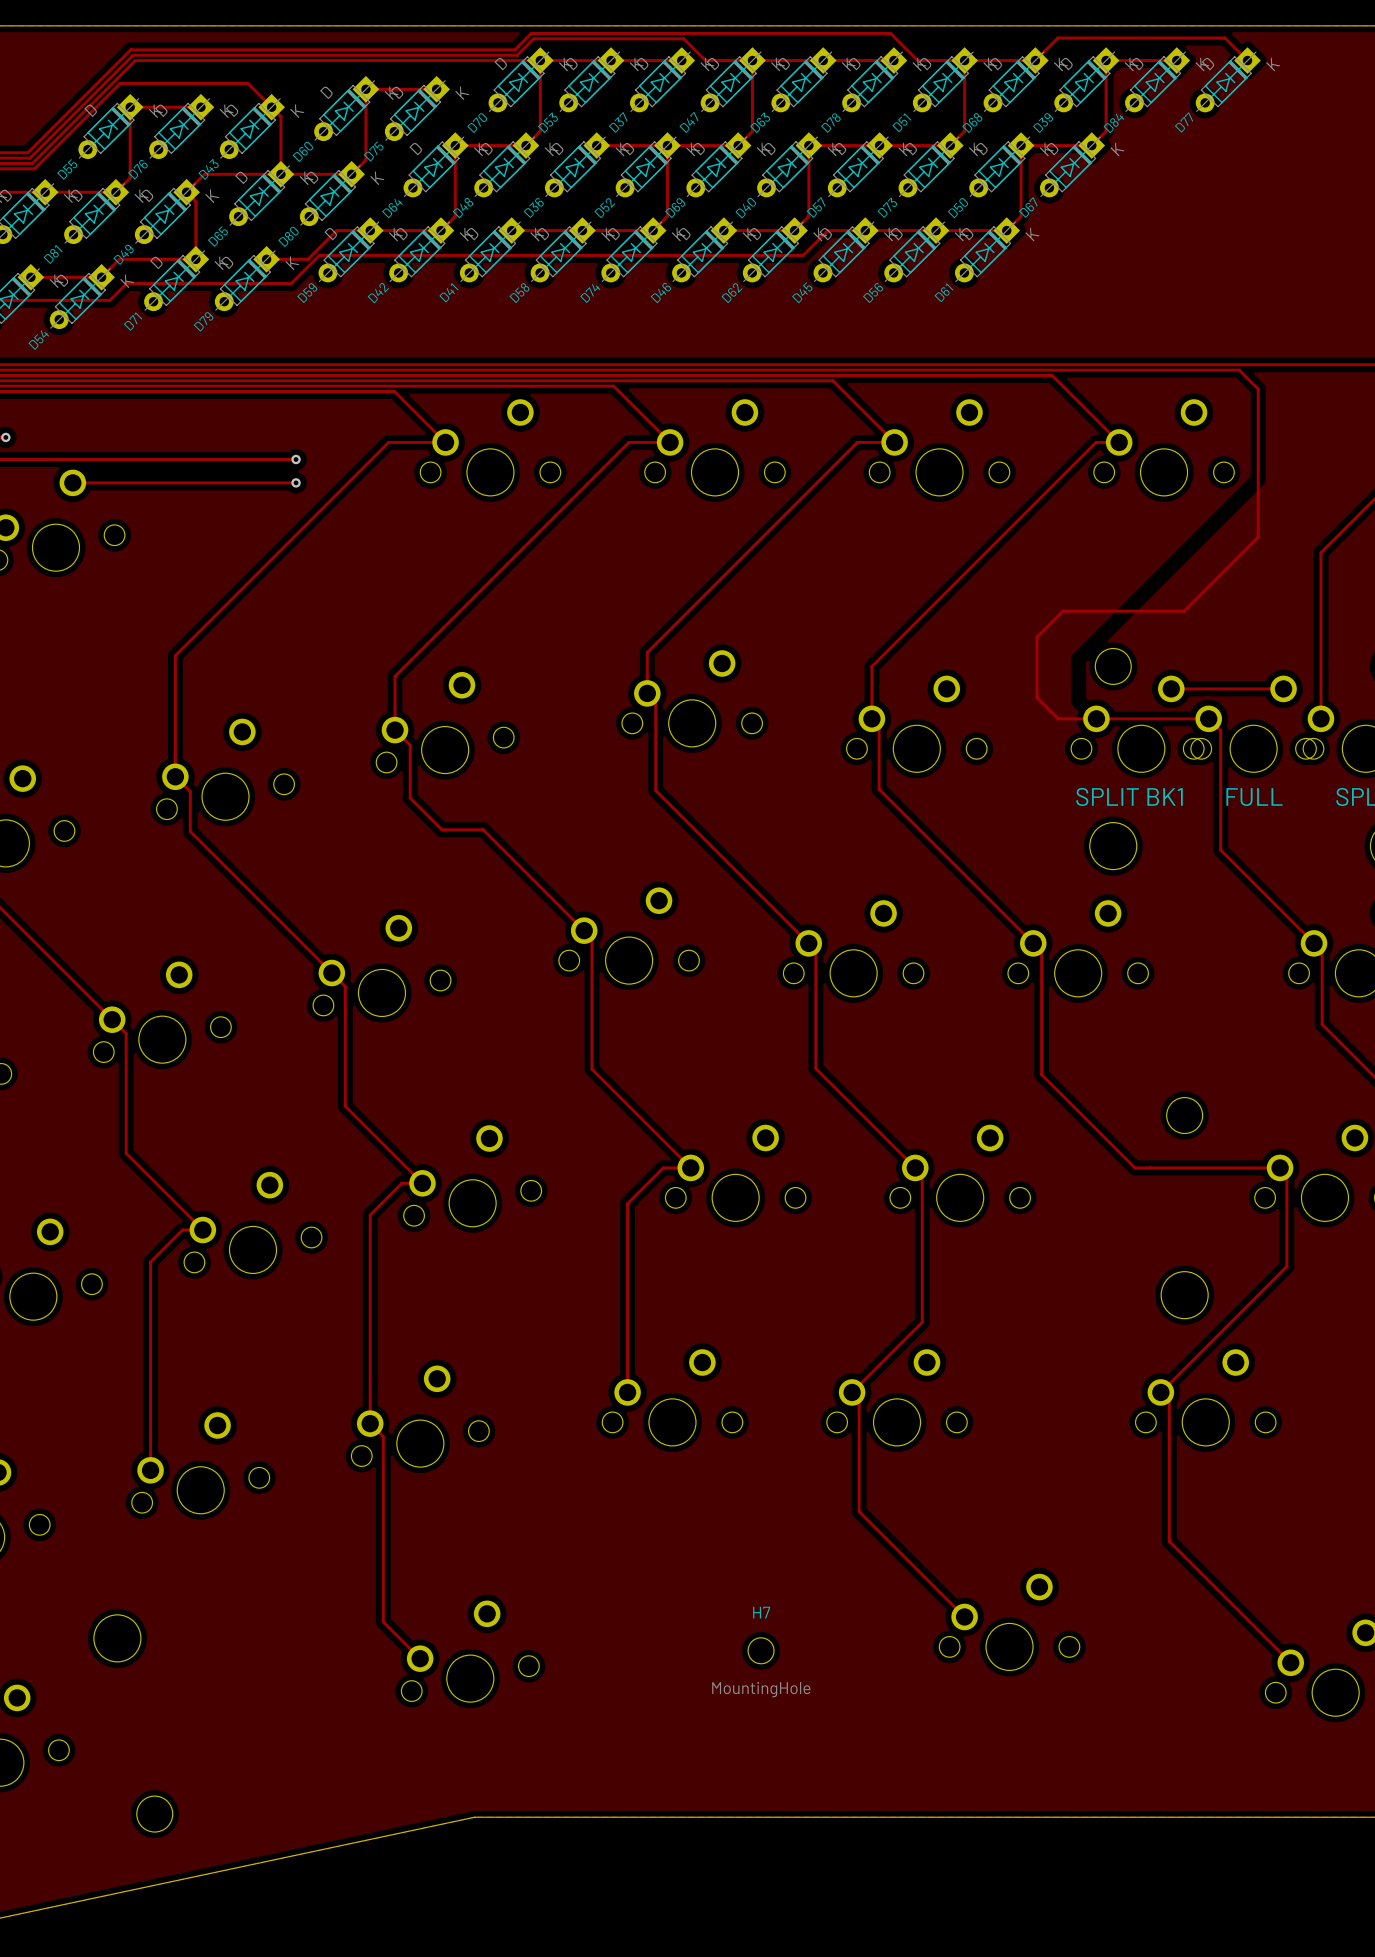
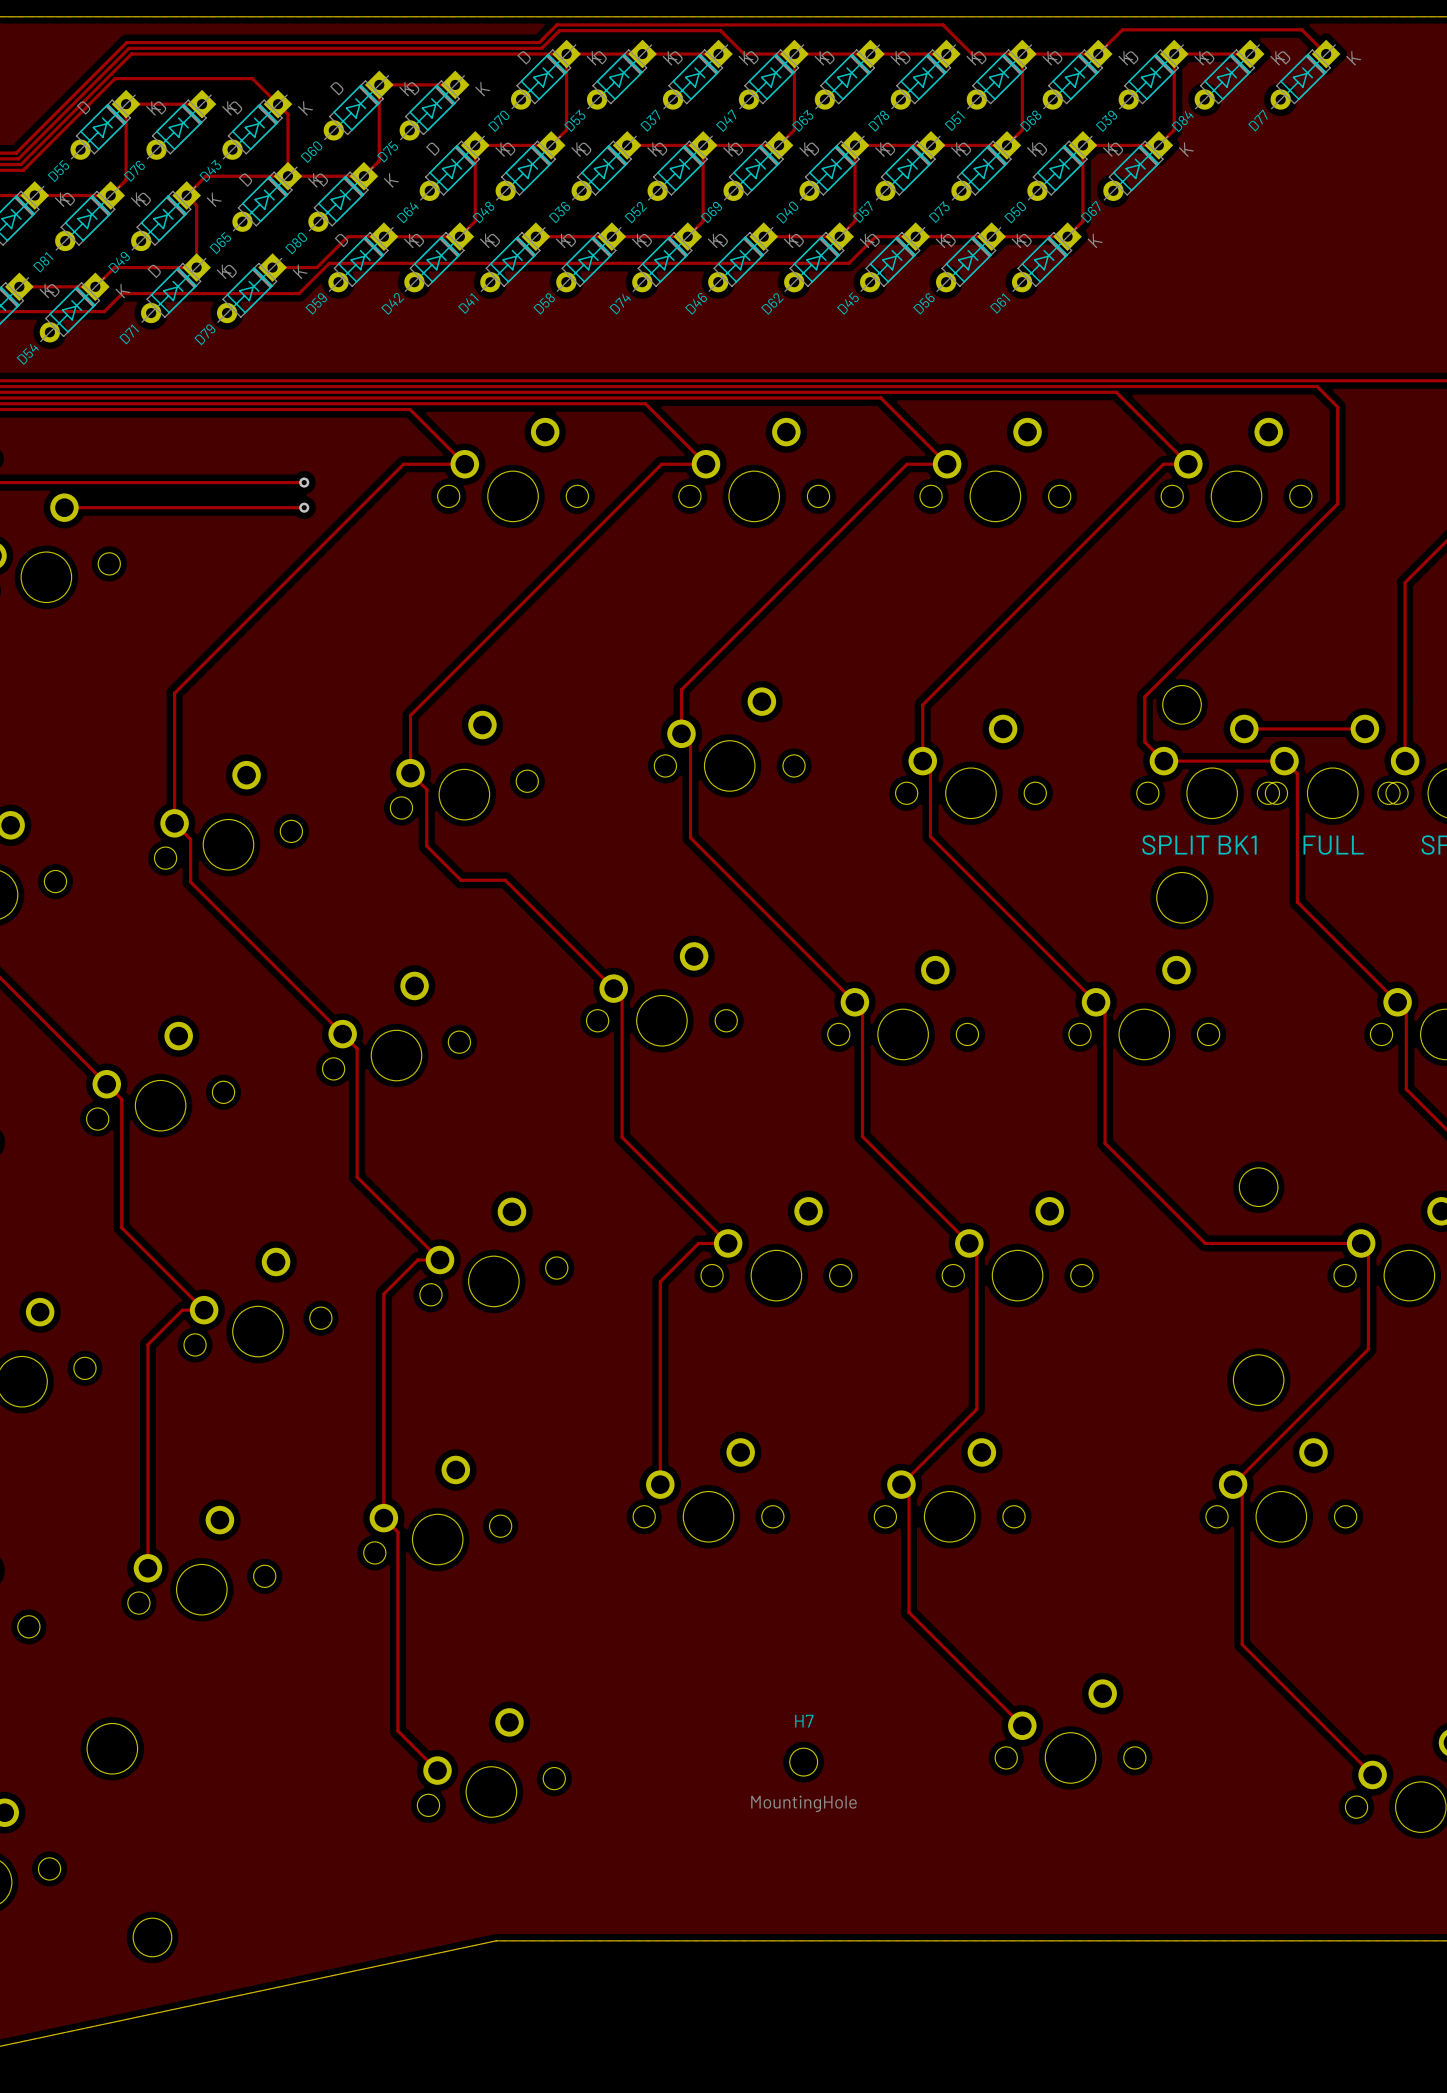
track: (1258, 479) (1258, 537) (1184, 611) (1062, 611) (1036, 637) (1036, 697) (1058, 718) (1096, 718) -> (1337, 503) (1144, 696) (1144, 742) (1163, 761)

